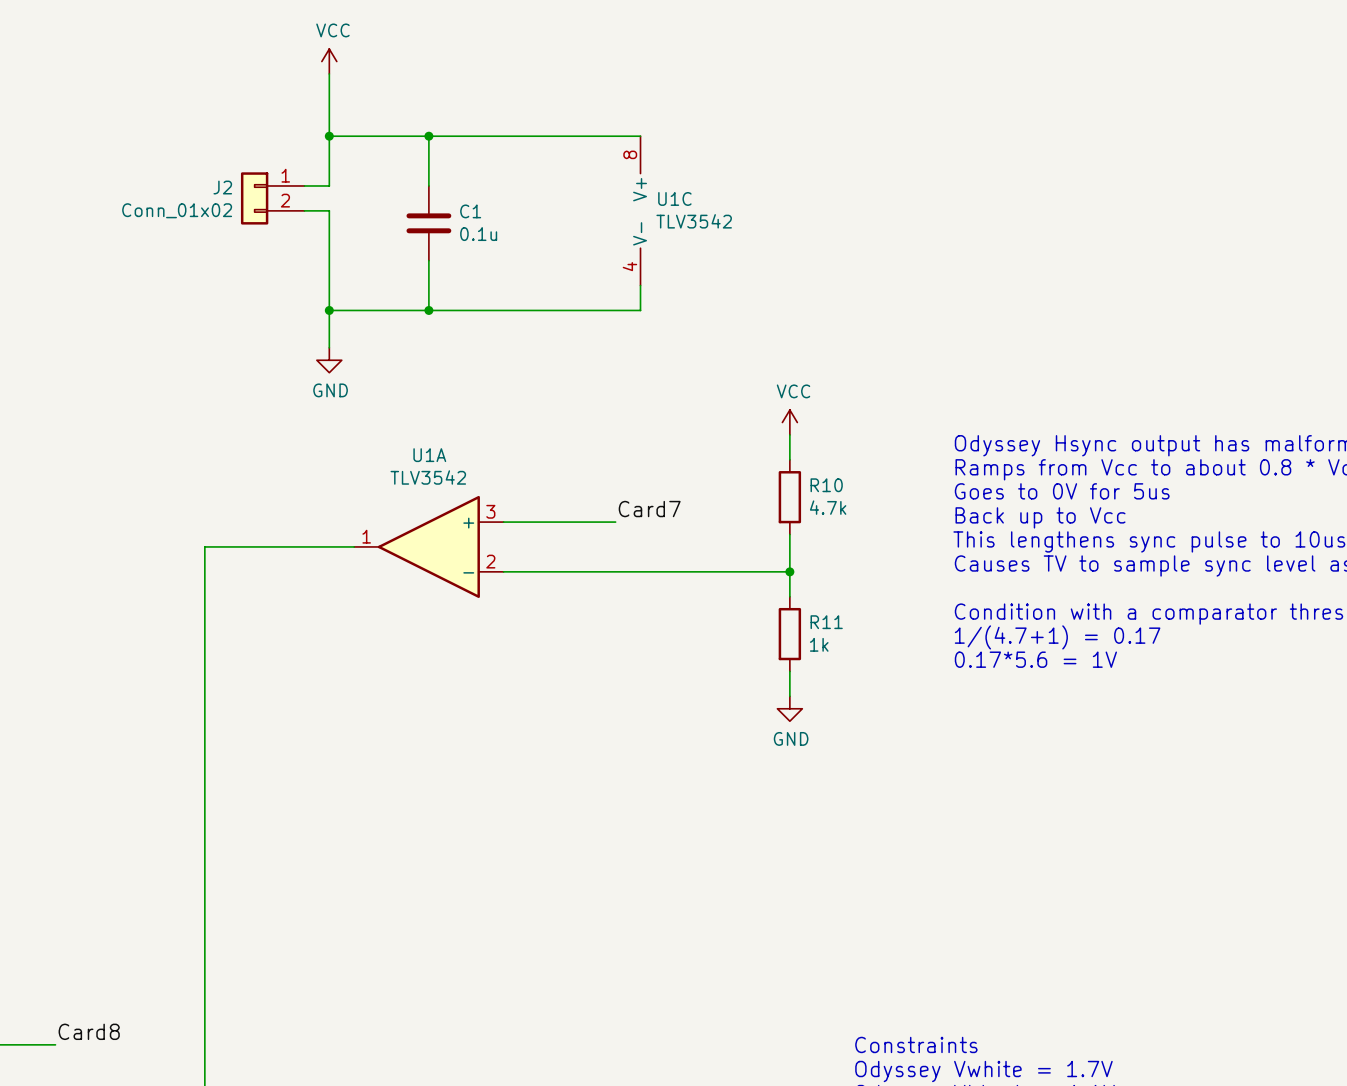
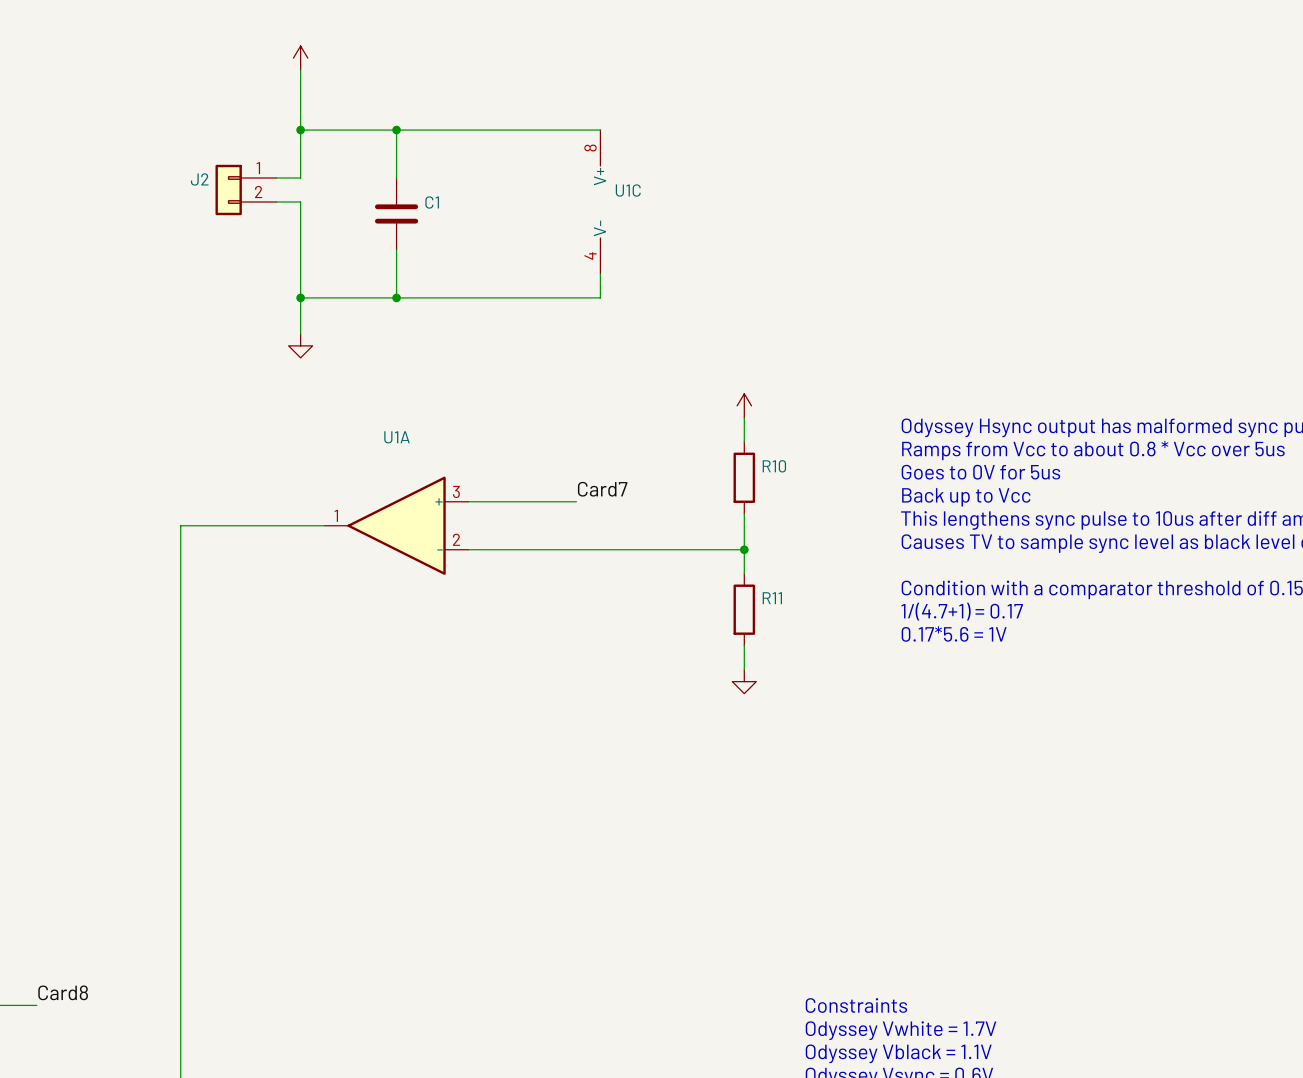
power symbol text: VCC (332, 30) -> none
J2 value: Conn_01x02 (177, 210) -> none
U1C value: TLV3542 (694, 221) -> none
C1 value: 0.1u (478, 234) -> none
power symbol text: GND (330, 390) -> none
power symbol text: VCC (793, 391) -> none
U1A value: TLV3542 (428, 477) -> none
R10 value: 4.7k (828, 507) -> none
R11 value: 1k (819, 644) -> none
power symbol text: GND (791, 738) -> none

